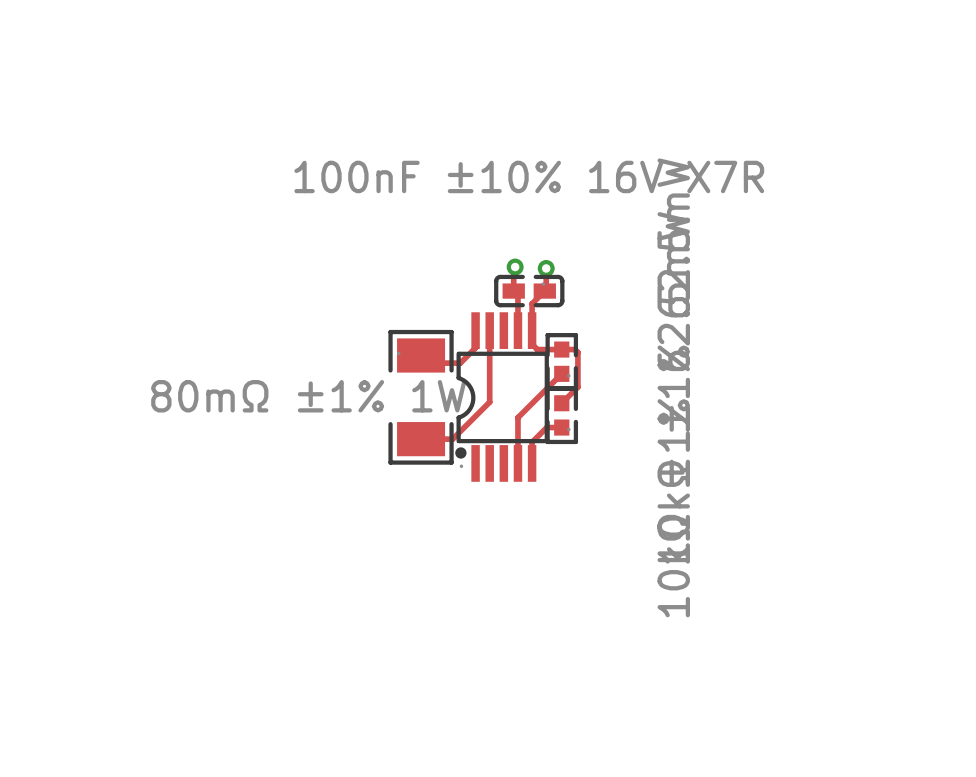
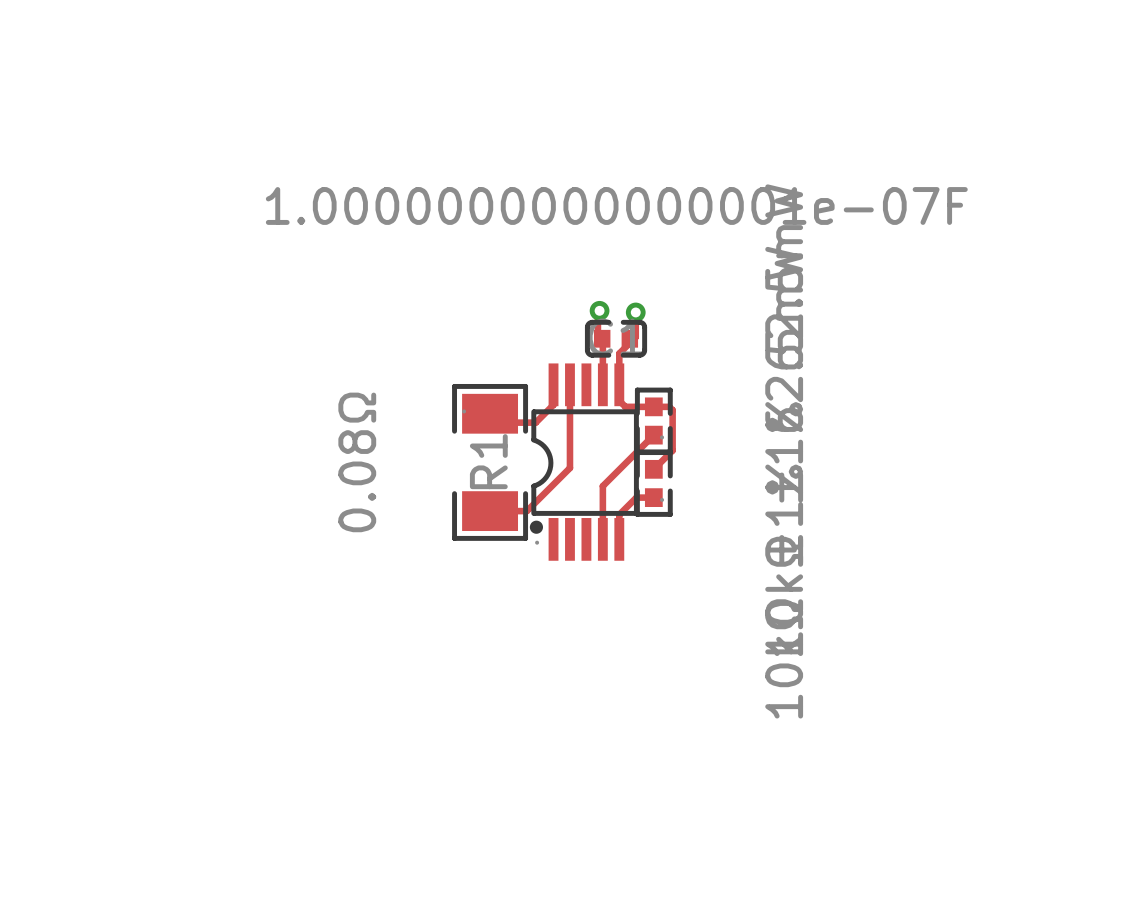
part: 100nF ±10% 16V X7R (529, 291) -> none
part: none -> 1.0000000000000001e-07F (616, 338)
R1 value: 80mΩ ±1% 1W (308, 396) -> 0.08Ω (357, 462)
R1 name: none -> R1 (488, 461)

